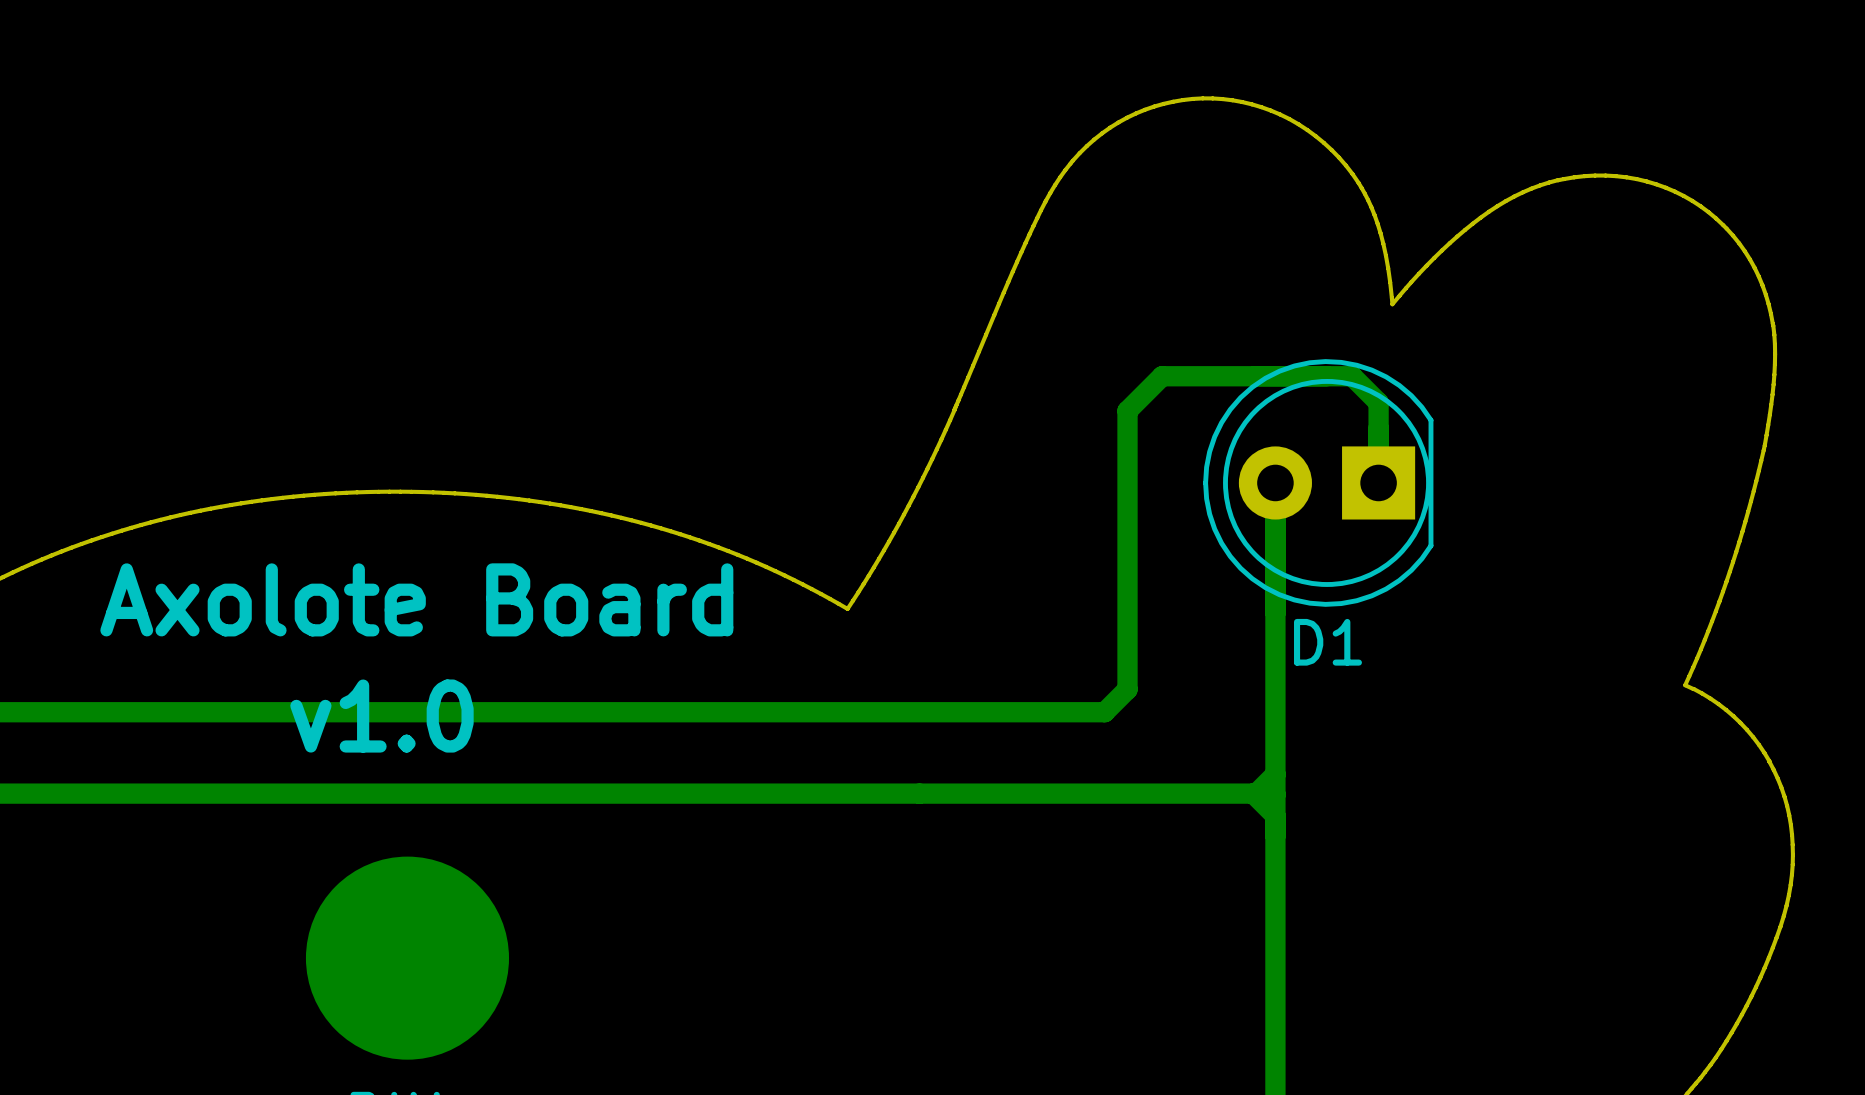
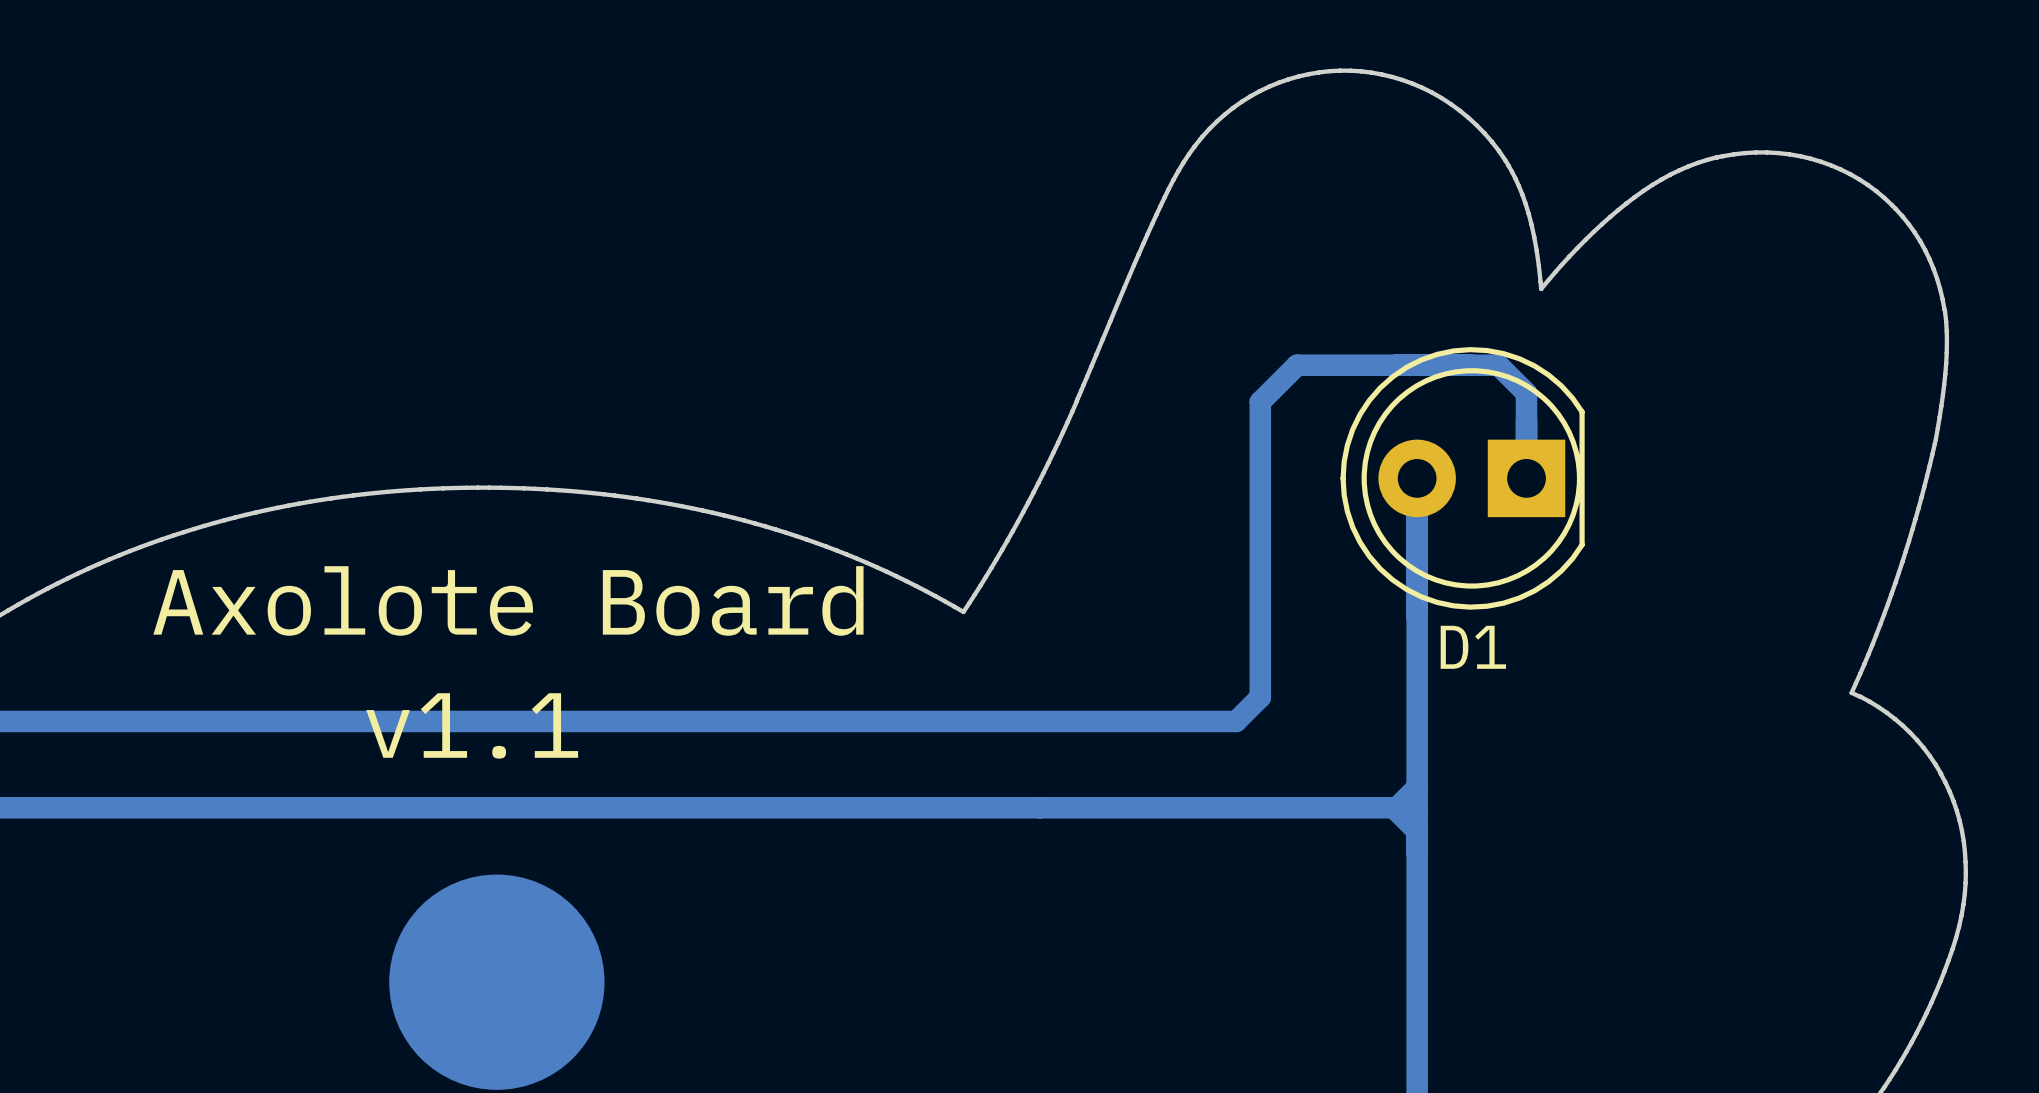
text: v1.0 (381, 716) -> v1.1 (472, 725)

